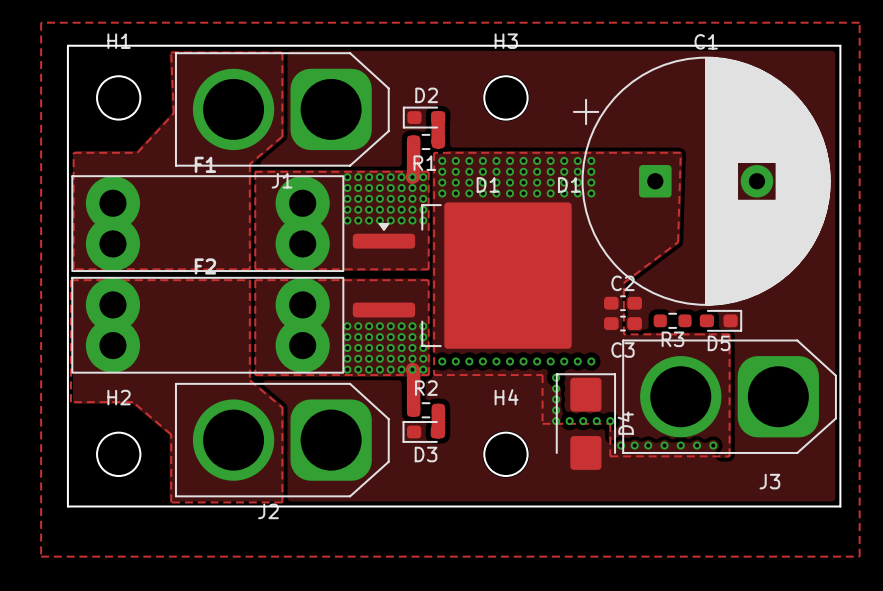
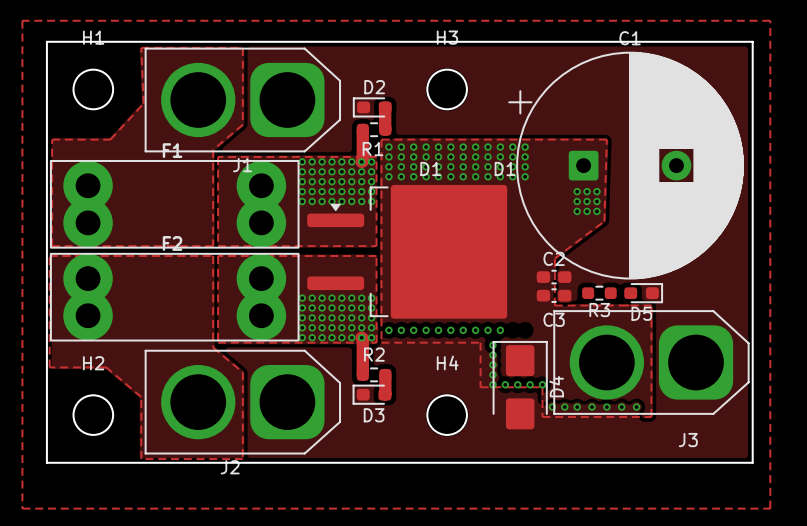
via: none -> (577, 191)
via: none -> (587, 191)
via: none -> (596, 191)
via: none -> (577, 201)
via: none -> (587, 201)
via: none -> (596, 201)
via: none -> (577, 211)
via: none -> (587, 211)
via: none -> (596, 211)
via: (577, 361) -> none
via: (591, 361) -> none

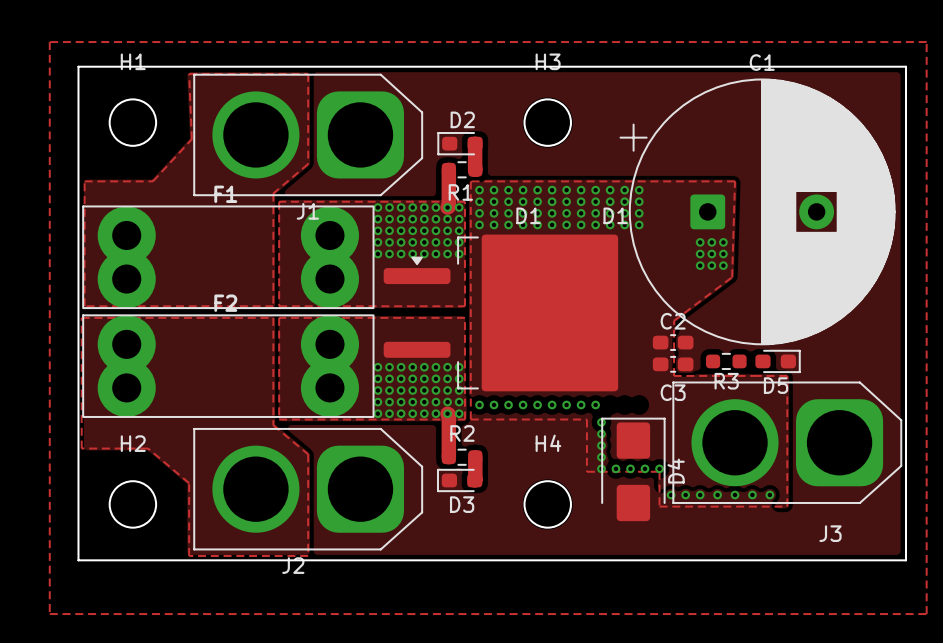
via: (500, 330) -> none

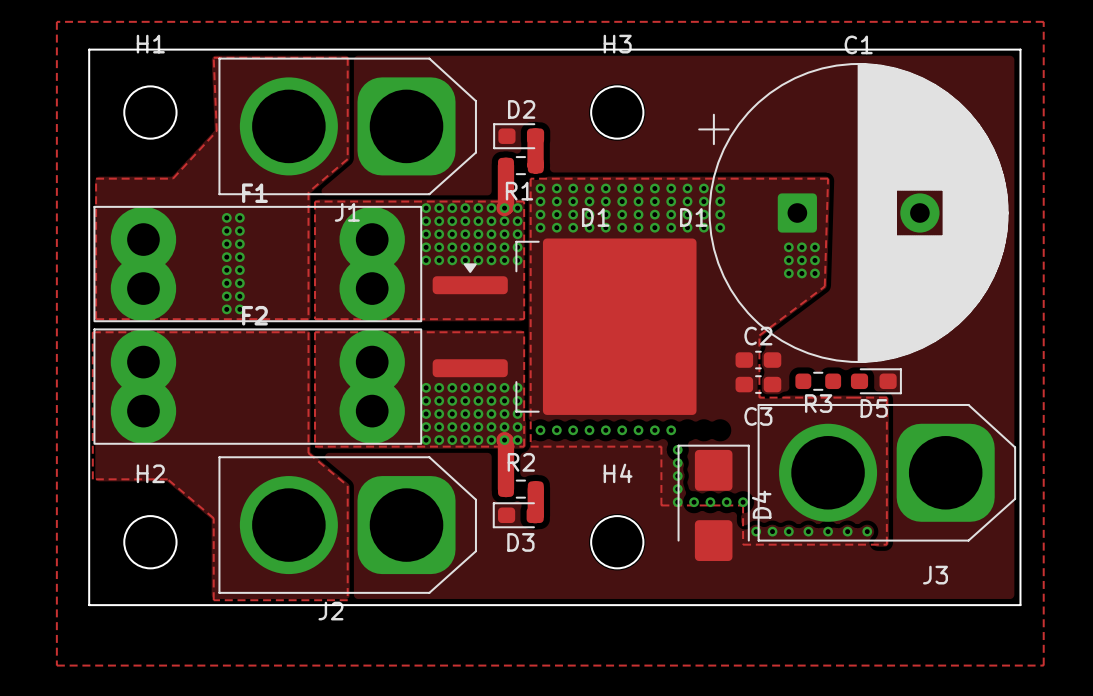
via: none -> (226, 217)
via: none -> (239, 217)
via: none -> (226, 230)
via: none -> (239, 230)
via: none -> (226, 244)
via: none -> (239, 244)
via: none -> (226, 257)
via: none -> (239, 257)
via: none -> (226, 270)
via: none -> (239, 270)
via: none -> (226, 283)
via: none -> (239, 283)
via: none -> (226, 296)
via: none -> (239, 296)
via: none -> (226, 309)
via: none -> (239, 309)

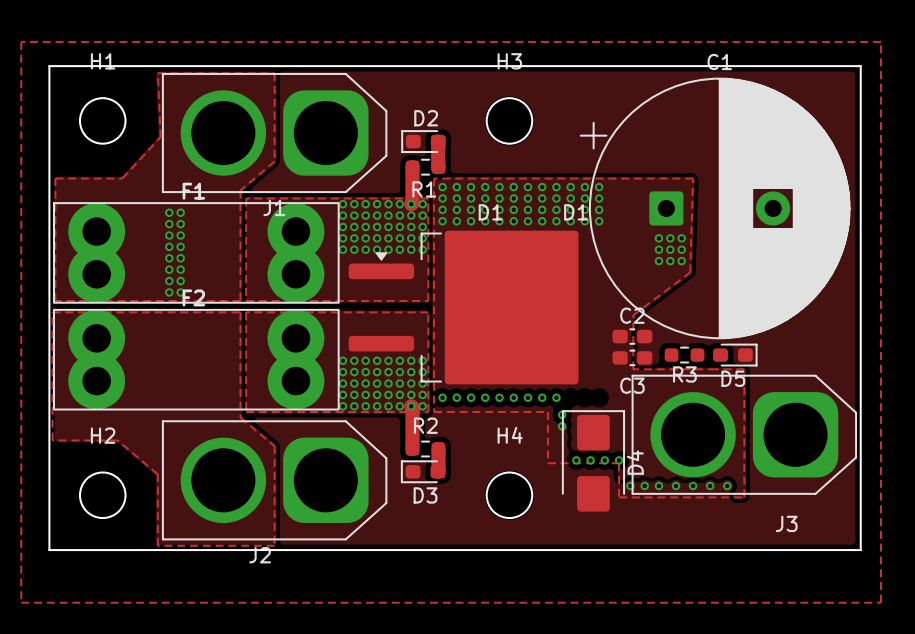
via: (677, 476) -> none
via: (677, 489) -> none
via: (677, 502) -> none

